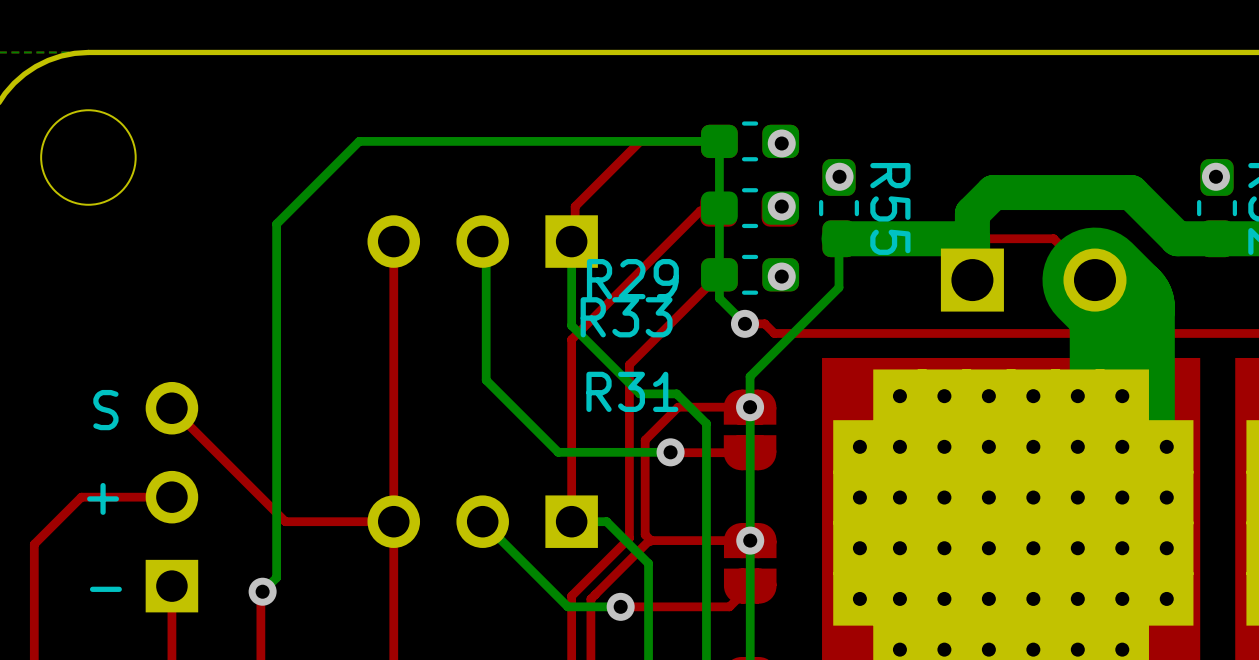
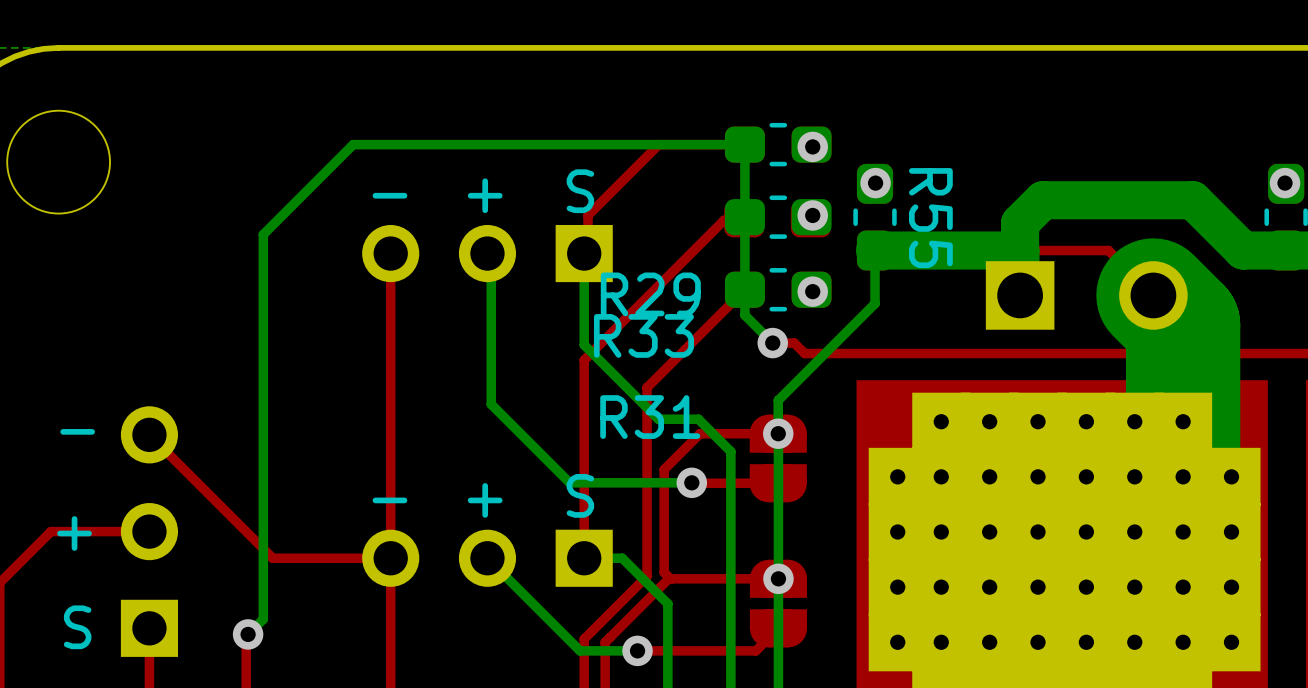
text: none -> S (580, 191)
text: none -> - (389, 195)
text: none -> + (485, 195)
part text: none -> - (77, 431)
part text: S (105, 410) -> none
text: none -> S (580, 495)
text: none -> - (389, 500)
text: none -> + (485, 500)
part text: - (105, 589) -> S (77, 627)

